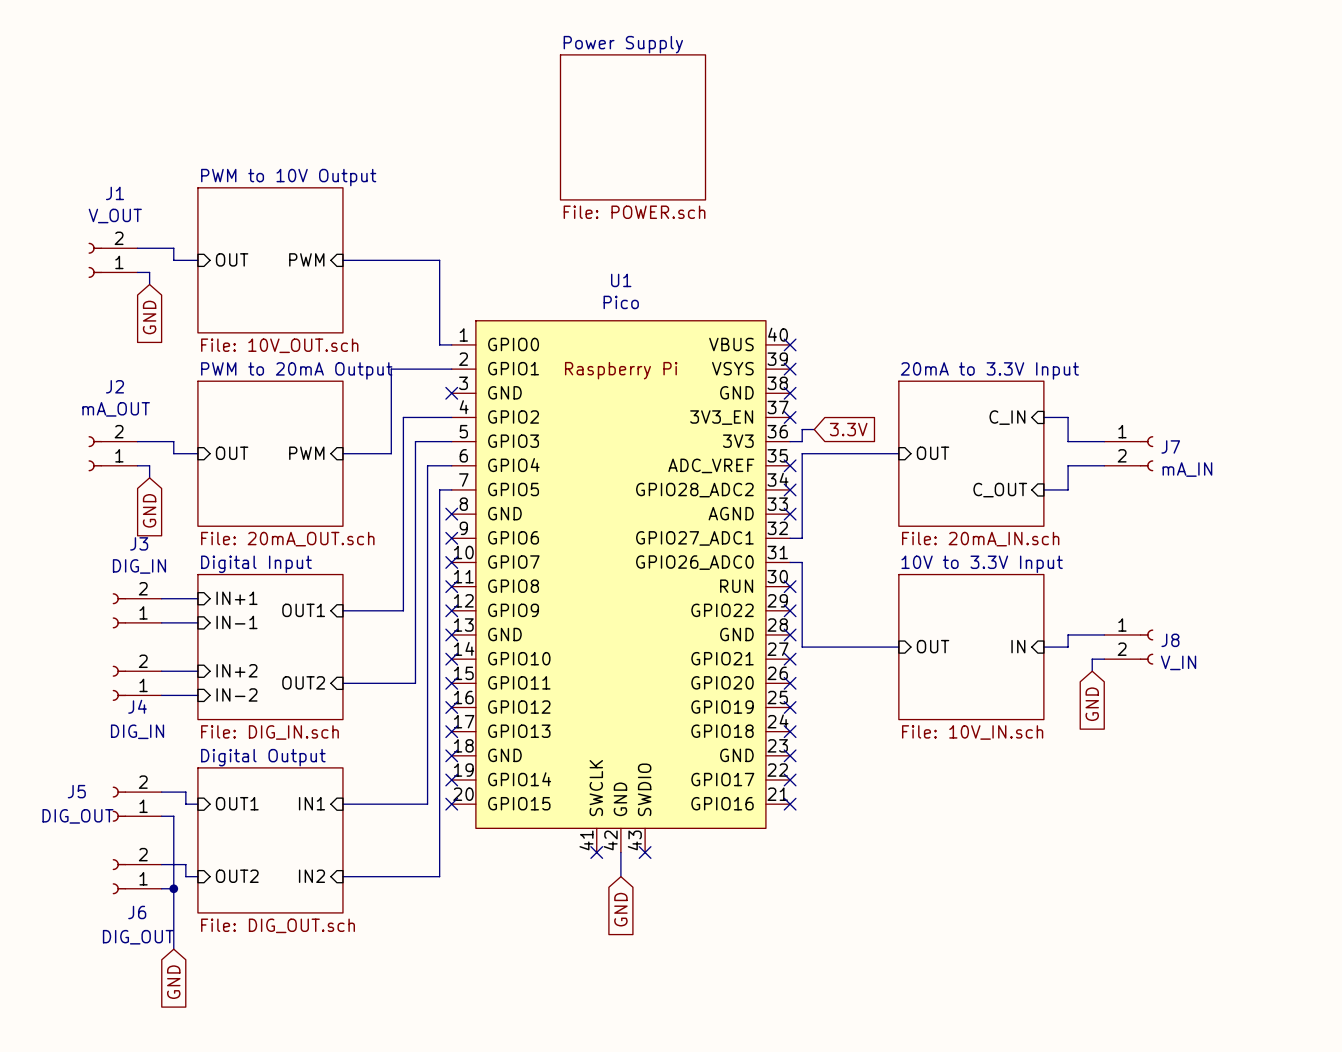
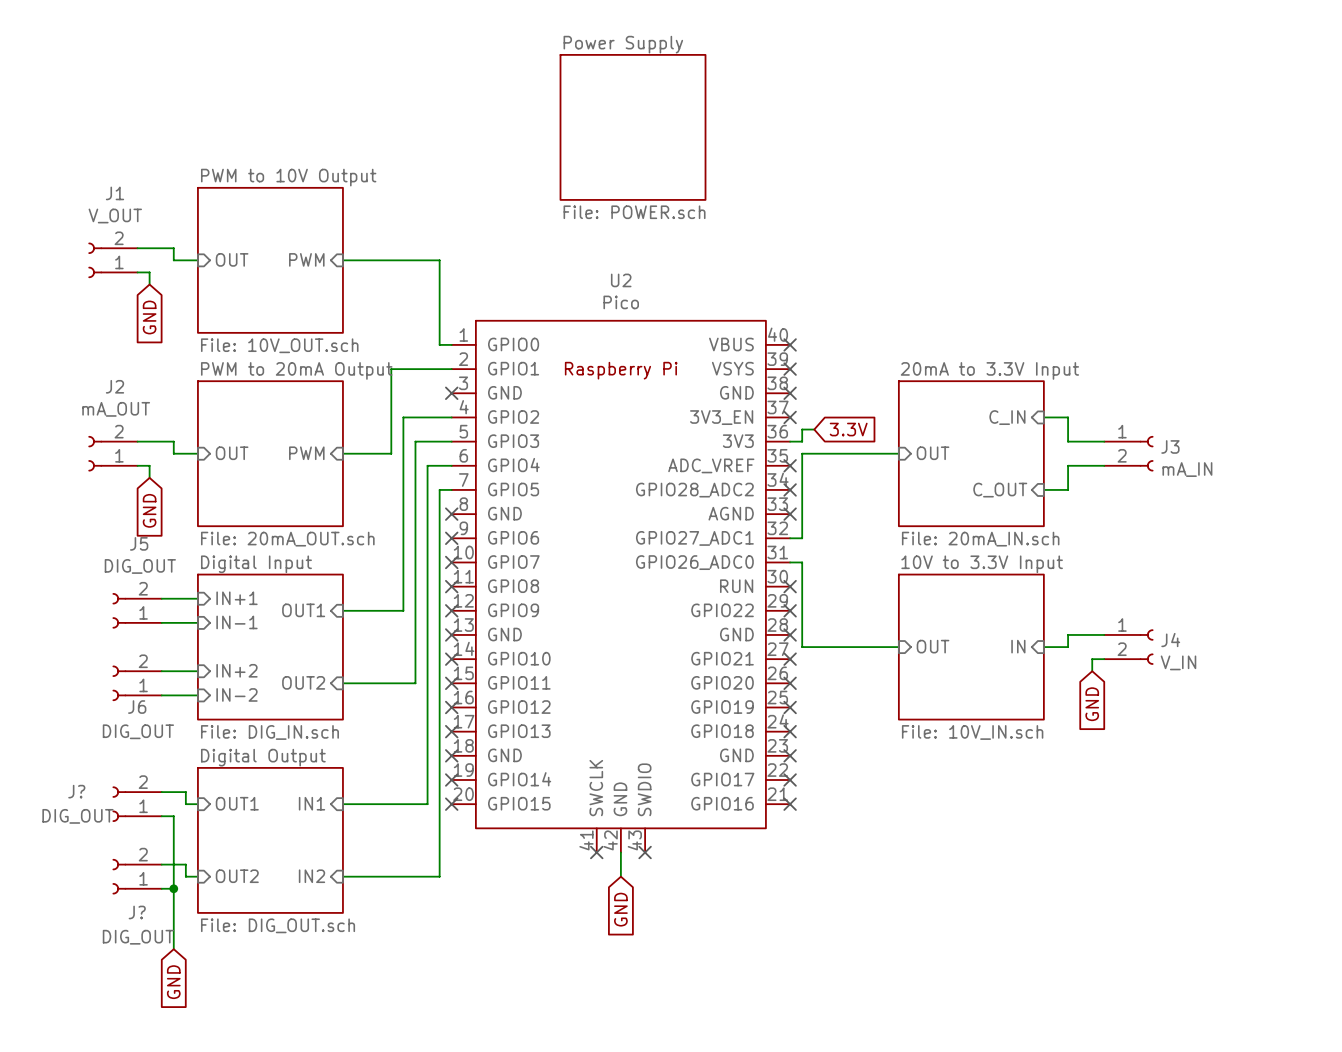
U1 name: U1 (621, 280) -> U2 (621, 280)
J7 name: J7 (1170, 446) -> J3 (1170, 446)
J3 name: J3 (139, 543) -> J5 (139, 543)
J3 value: DIG_IN (139, 566) -> DIG_OUT (140, 566)
J8 name: J8 (1170, 640) -> J4 (1170, 640)
J4 name: J4 (137, 706) -> J6 (137, 707)
J4 value: DIG_IN (137, 731) -> DIG_OUT (138, 731)
J5 name: J5 (76, 791) -> J? (76, 791)
J6 name: J6 (137, 912) -> J? (137, 912)

